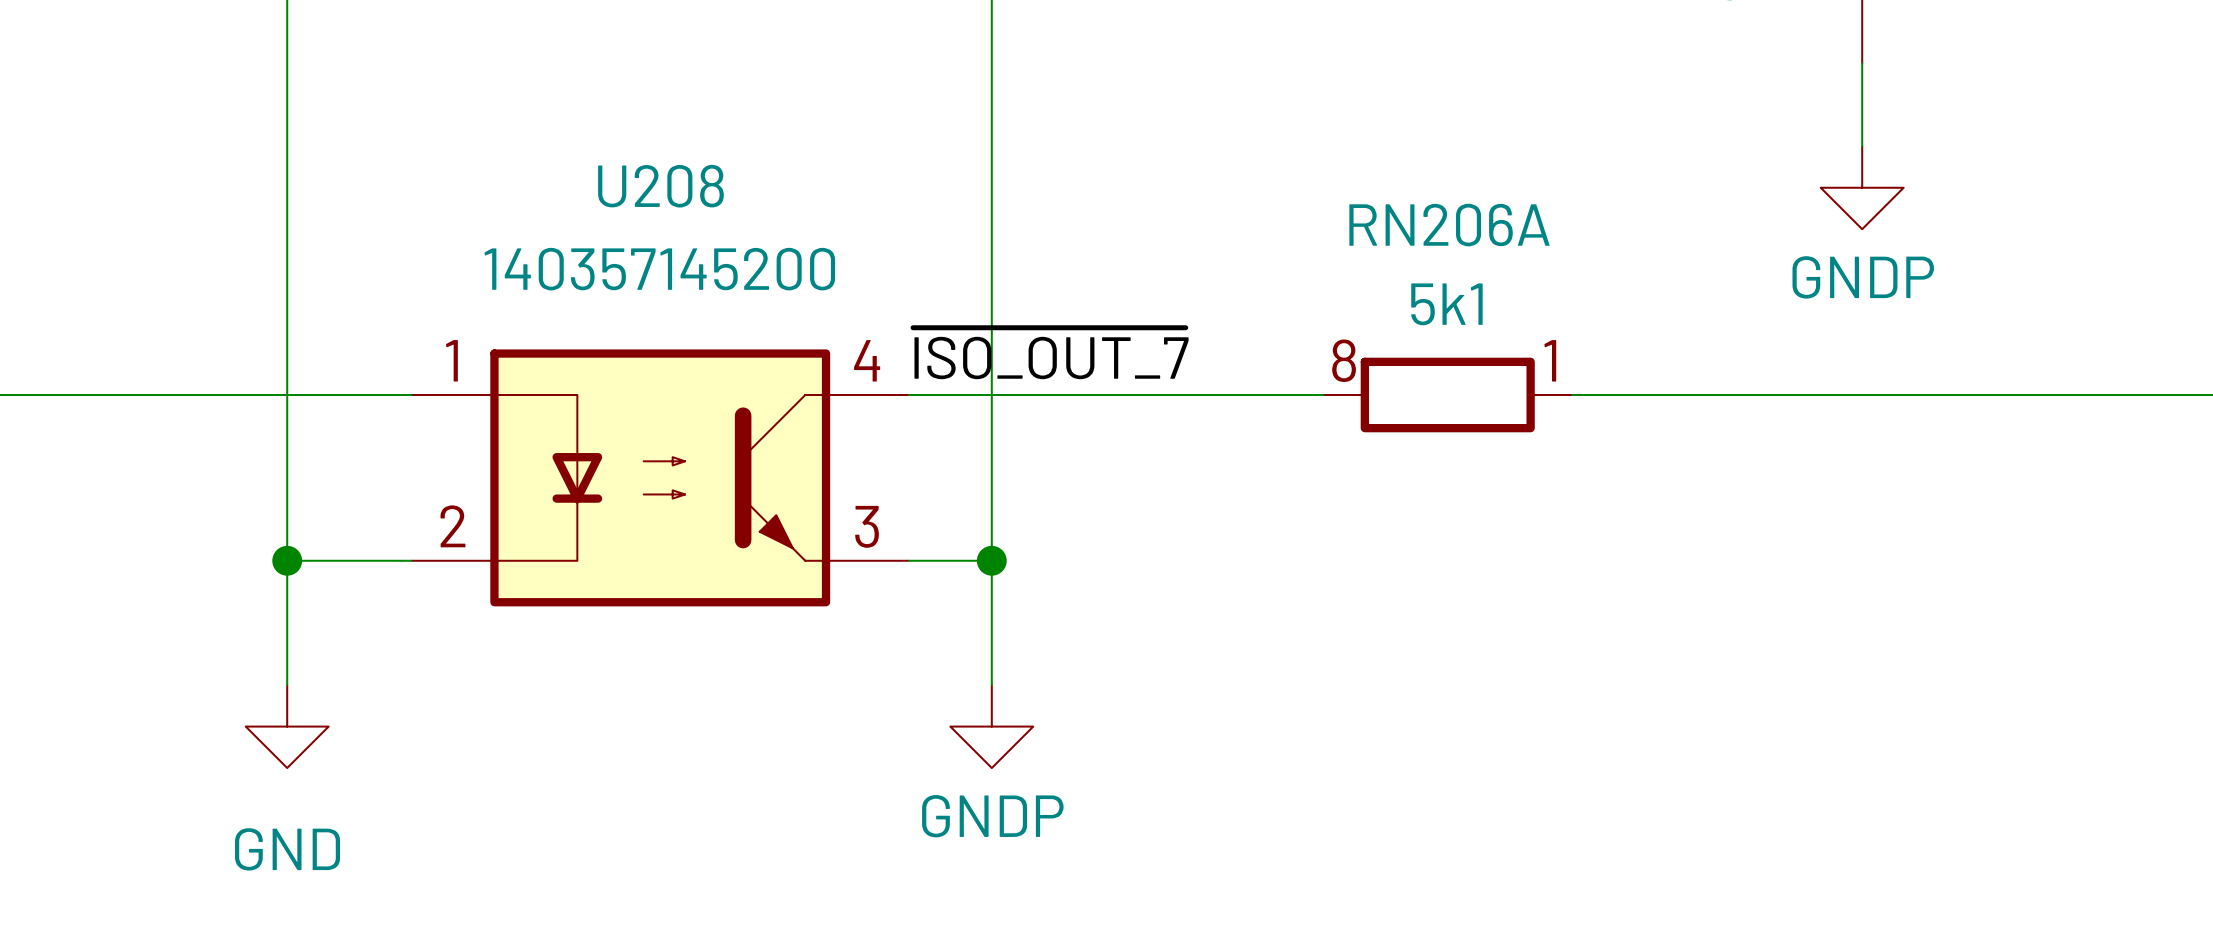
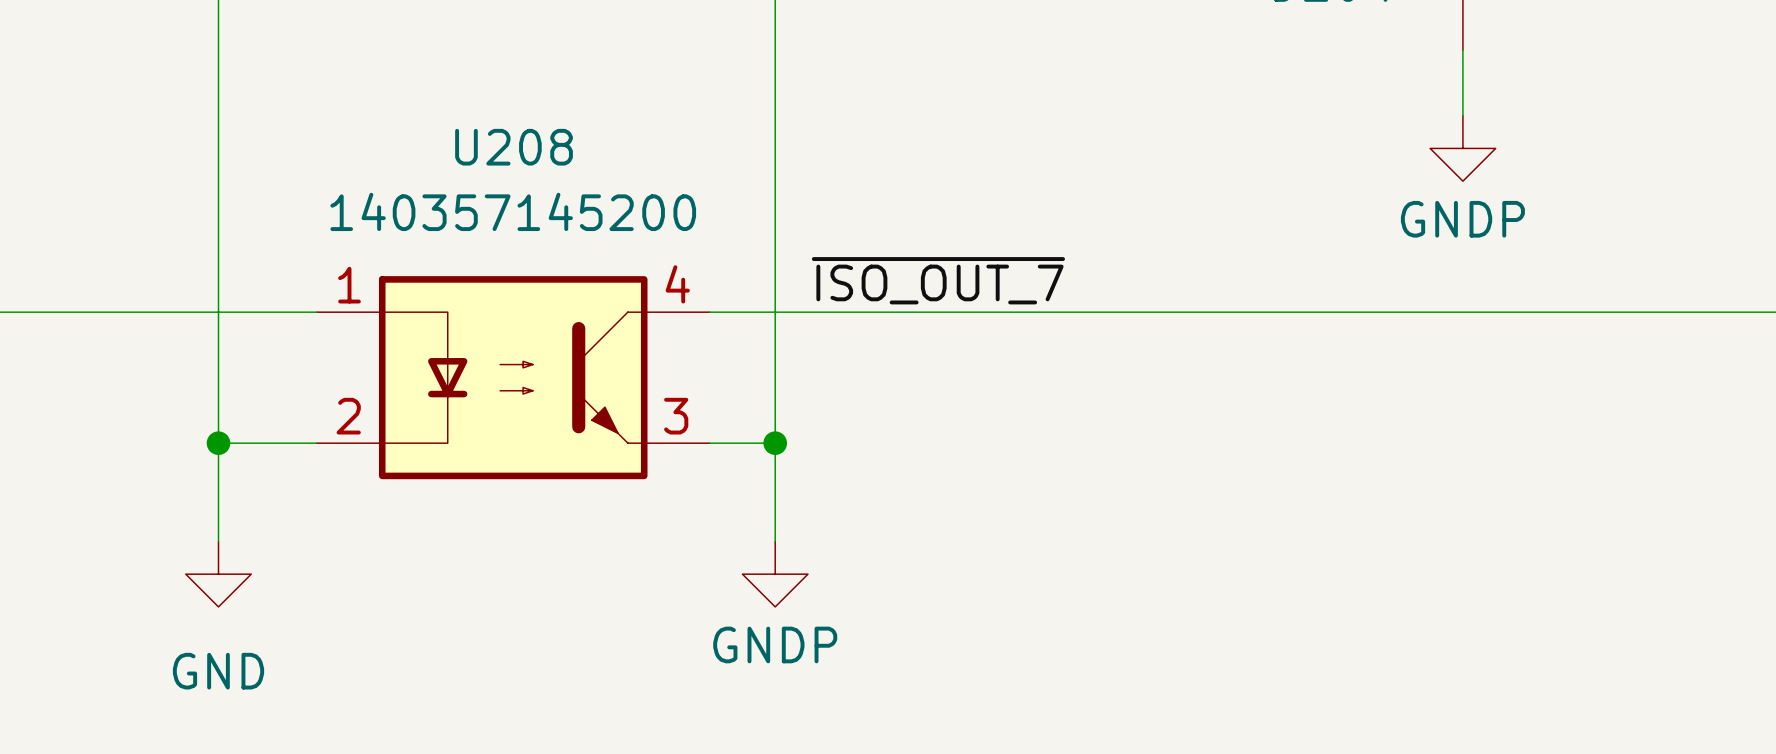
label position: ~{ISO_OUT_7} (1050, 353) -> ~{ISO_OUT_7} (938, 280)
wire: none -> (1037, 312) (1233, 312)
RN206A: 5k1 (1447, 394) -> none

